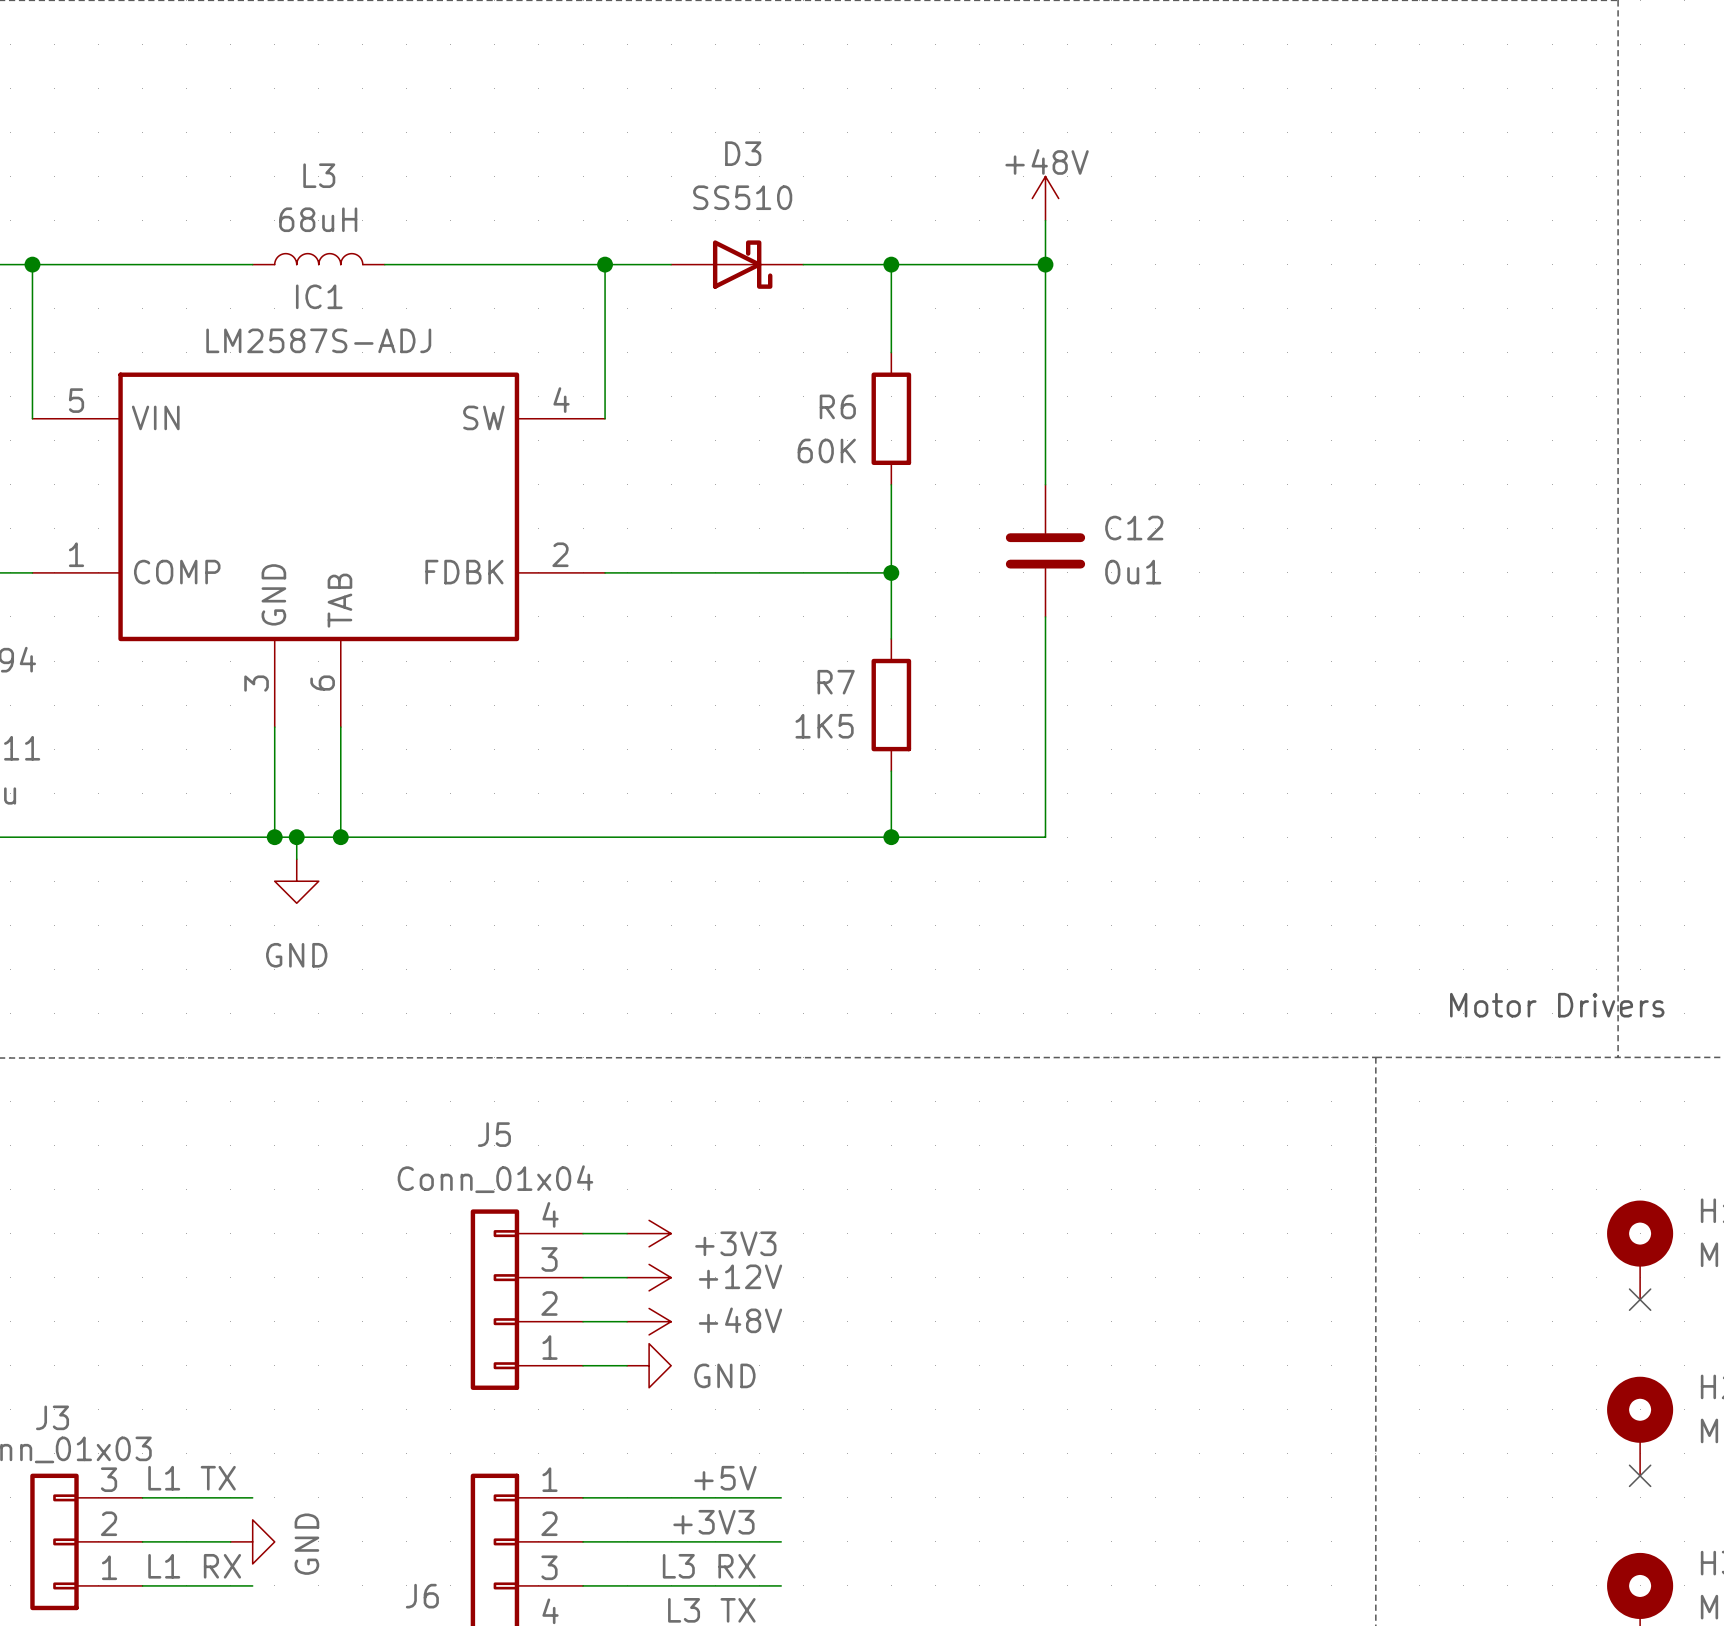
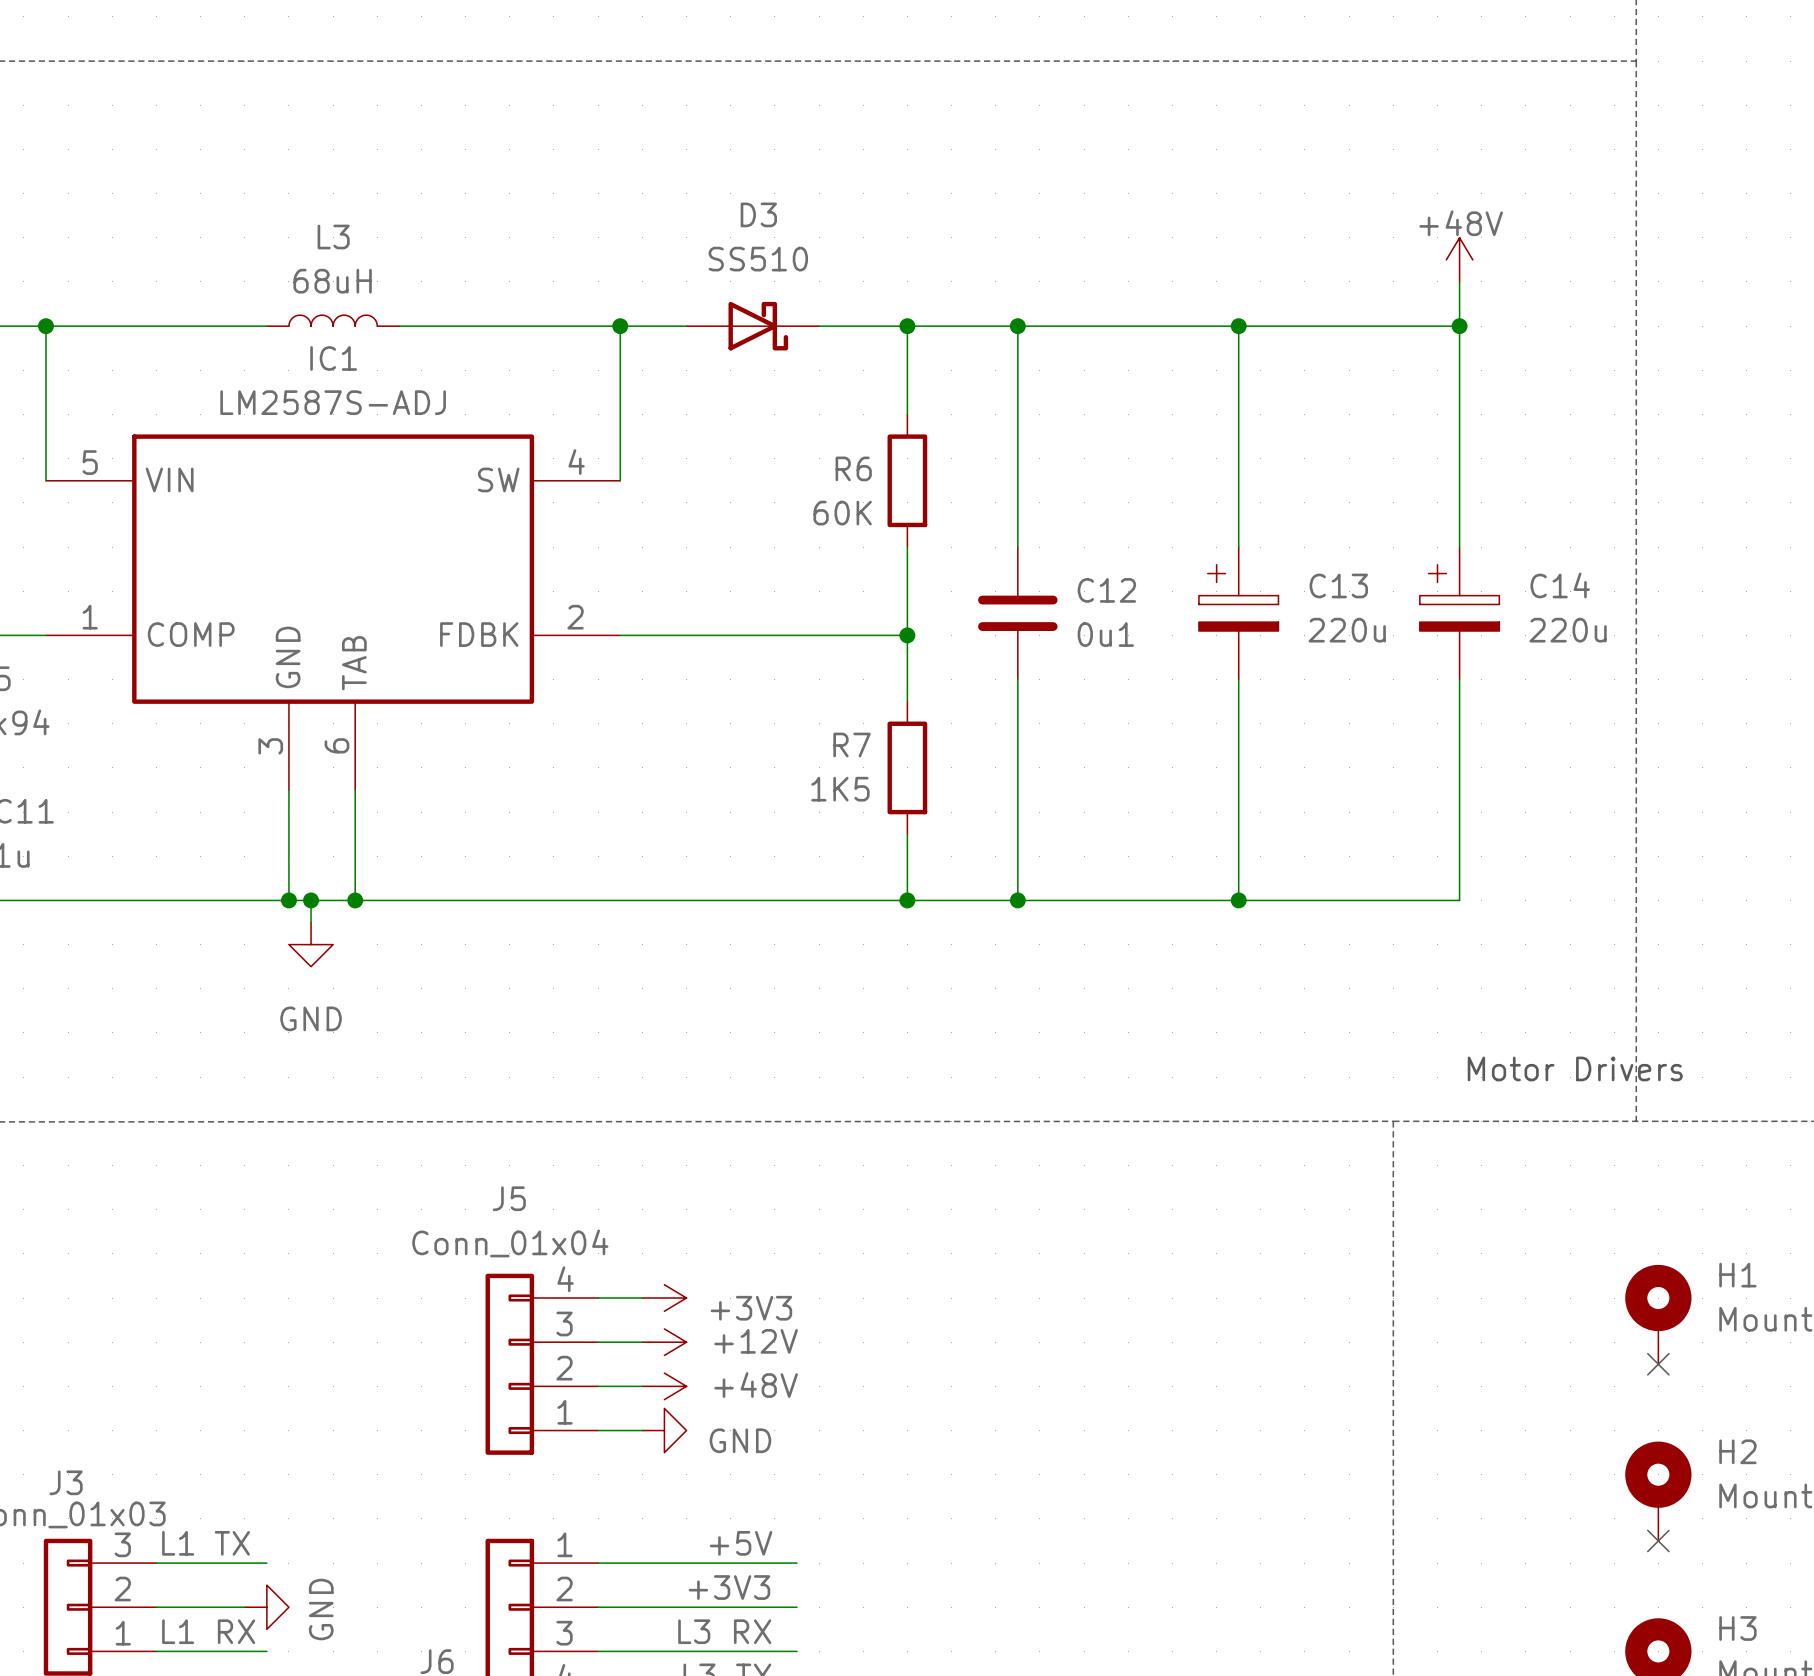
power symbol position: +48V (1045, 198) -> +48V (1459, 259)
wire: (1045, 220) (1045, 484) -> (1459, 281) (1459, 547)
wire: none -> (1017, 326) (1017, 547)
wire: none -> (1062, 326) (1459, 326)
junction position: (1045, 264) -> (1017, 326)
wire: none -> (1238, 326) (1238, 547)
junction: none -> (1238, 326)
junction: none -> (1459, 326)
C12 position: (1045, 550) -> (1017, 613)
C13: none -> 220u (1238, 613)
C14: none -> 220u (1459, 613)
wire: none -> (1017, 679) (1017, 900)
wire: (1045, 616) (1045, 837) -> (1459, 679) (1459, 900) (1062, 900)
wire: none -> (1238, 679) (1238, 900)
junction: none -> (1017, 900)
junction: none -> (1238, 900)

